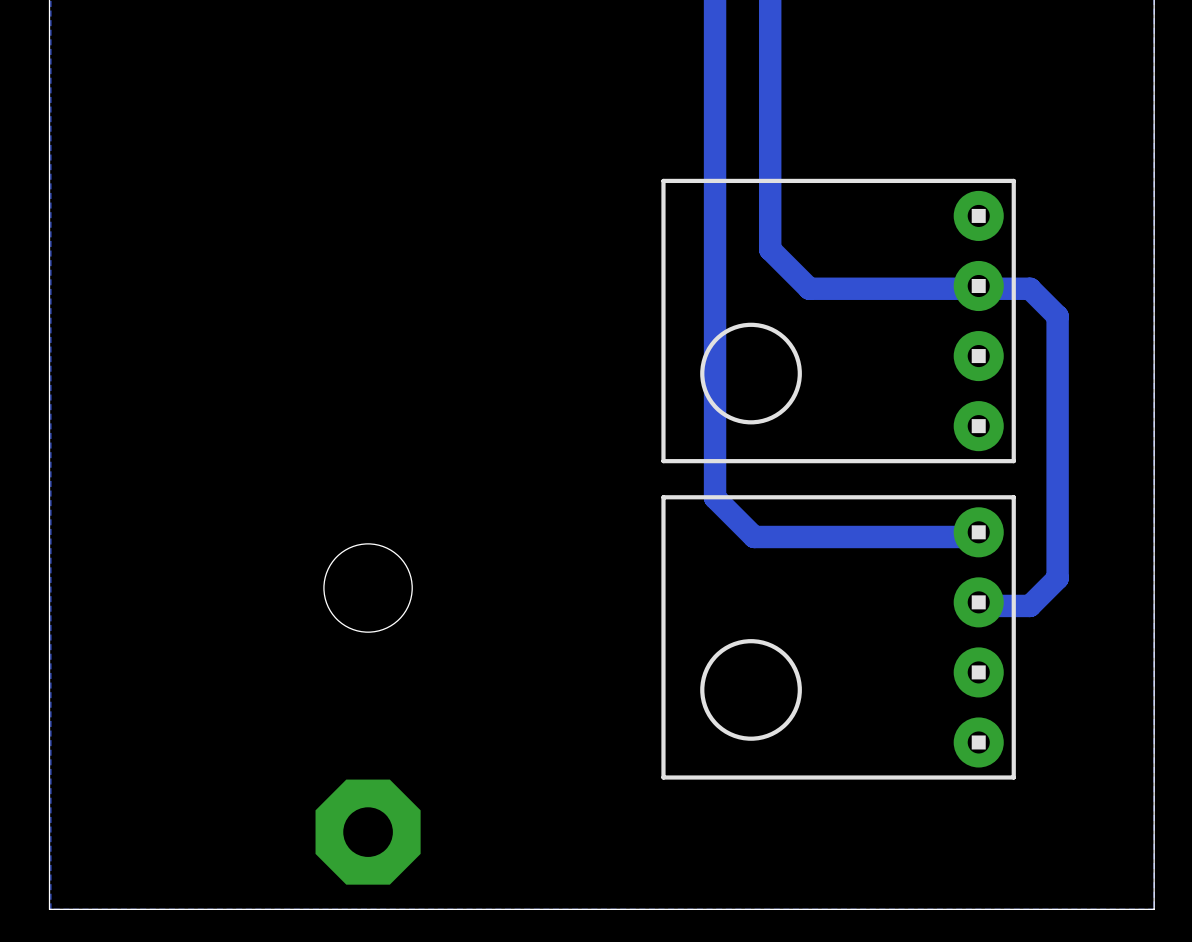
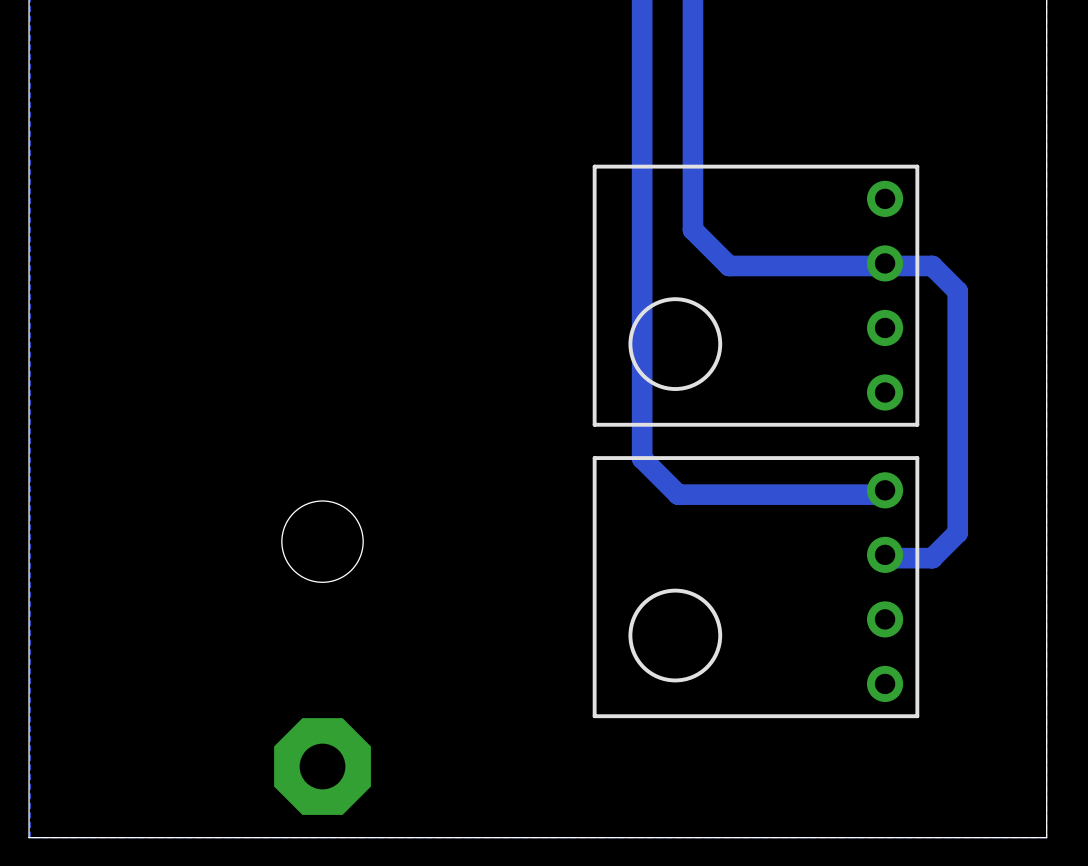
part footprint: [661, 178, 1016, 464] -> [592, 164, 920, 427]
part footprint: [661, 495, 1016, 780] -> [592, 456, 920, 719]

